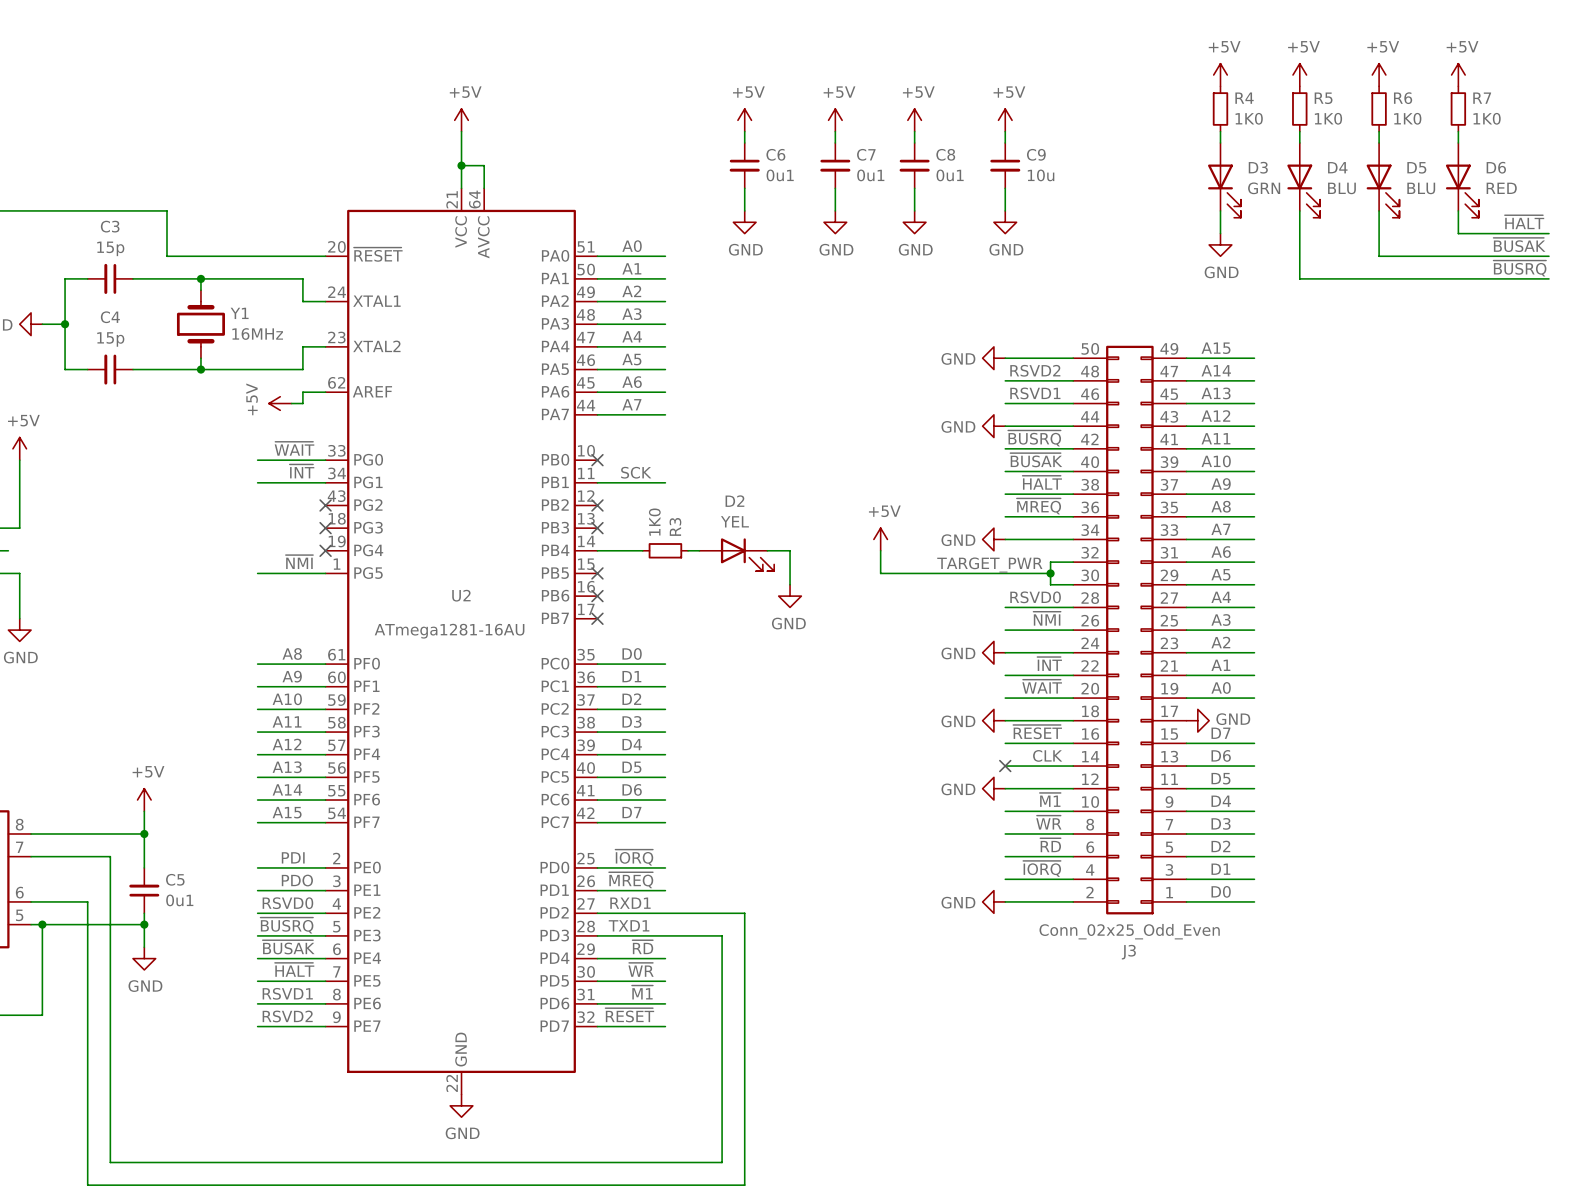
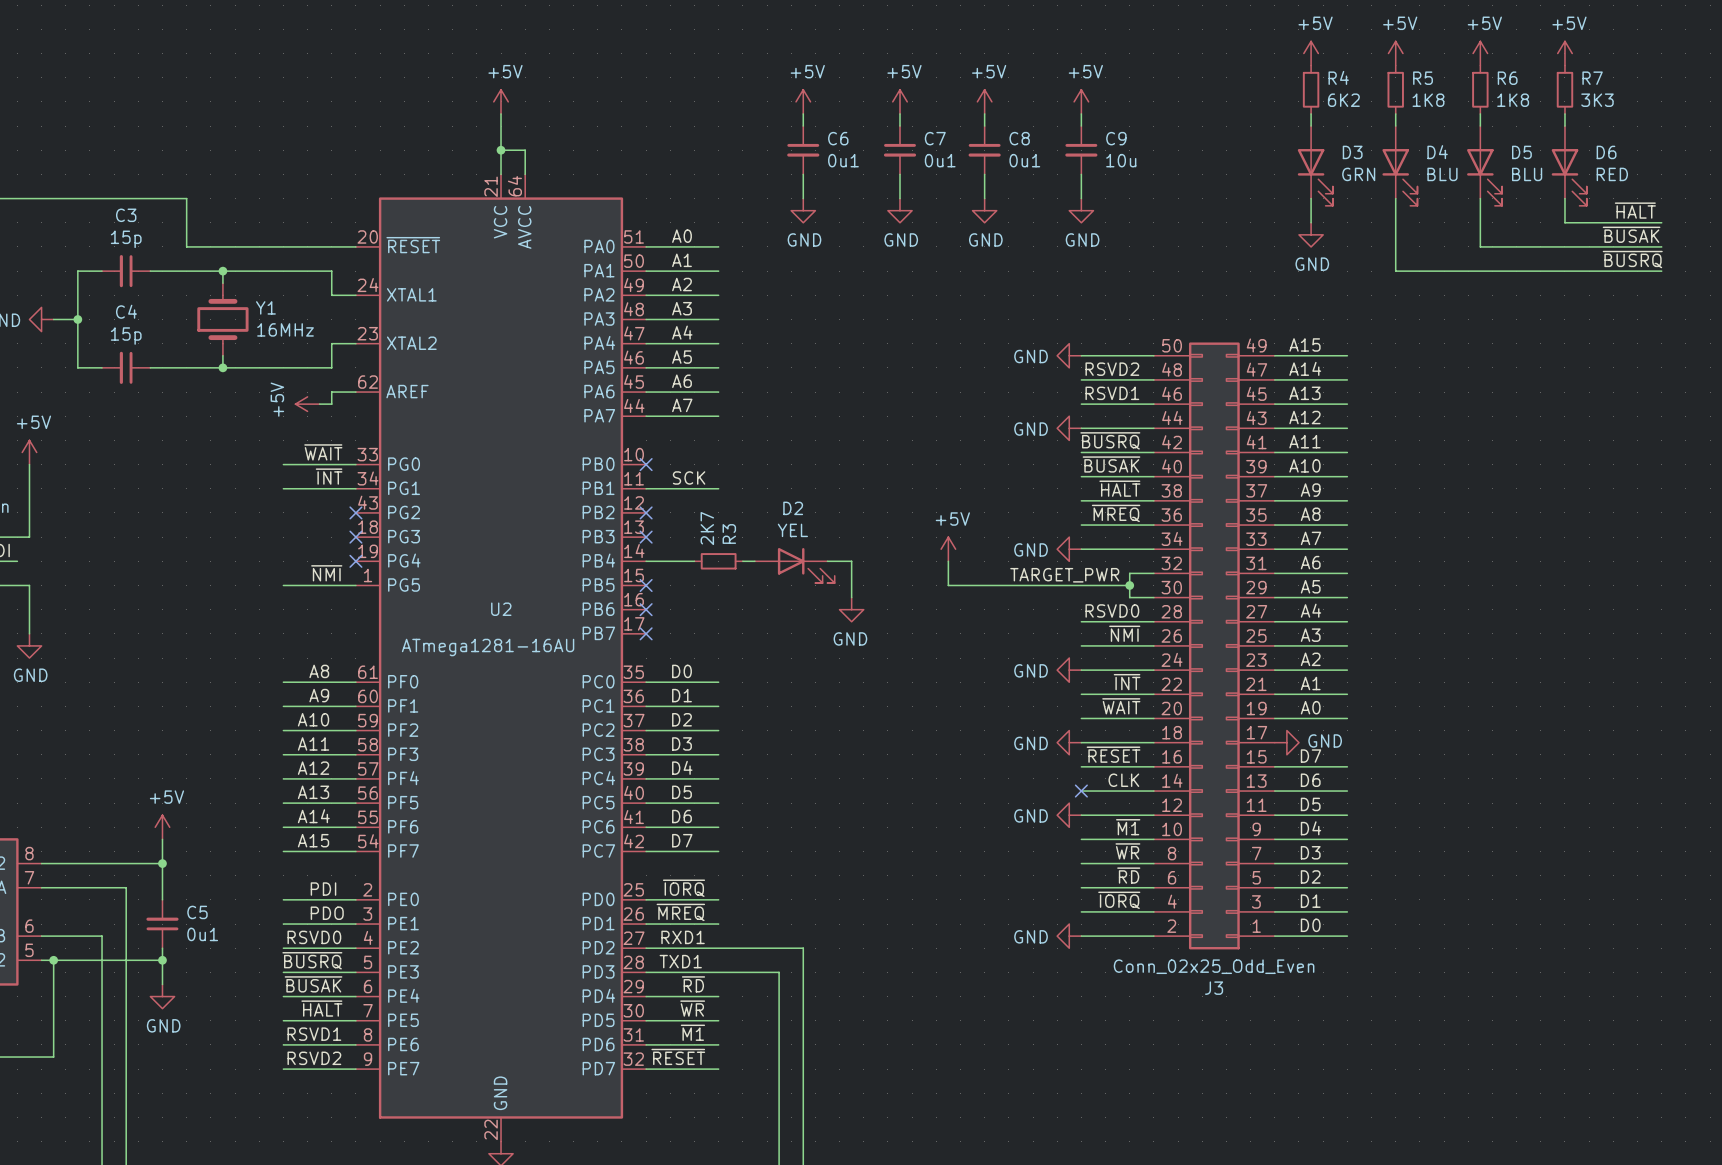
R4 value: 1K0 (1249, 118) -> 6K2 (1343, 100)
R5 value: 1K0 (1328, 118) -> 1K8 (1428, 100)
R6 value: 1K0 (1407, 118) -> 1K8 (1513, 100)
R7 value: 1K0 (1487, 118) -> 3K3 (1597, 100)
R3 value: 1K0 (654, 522) -> 2K7 (707, 528)

